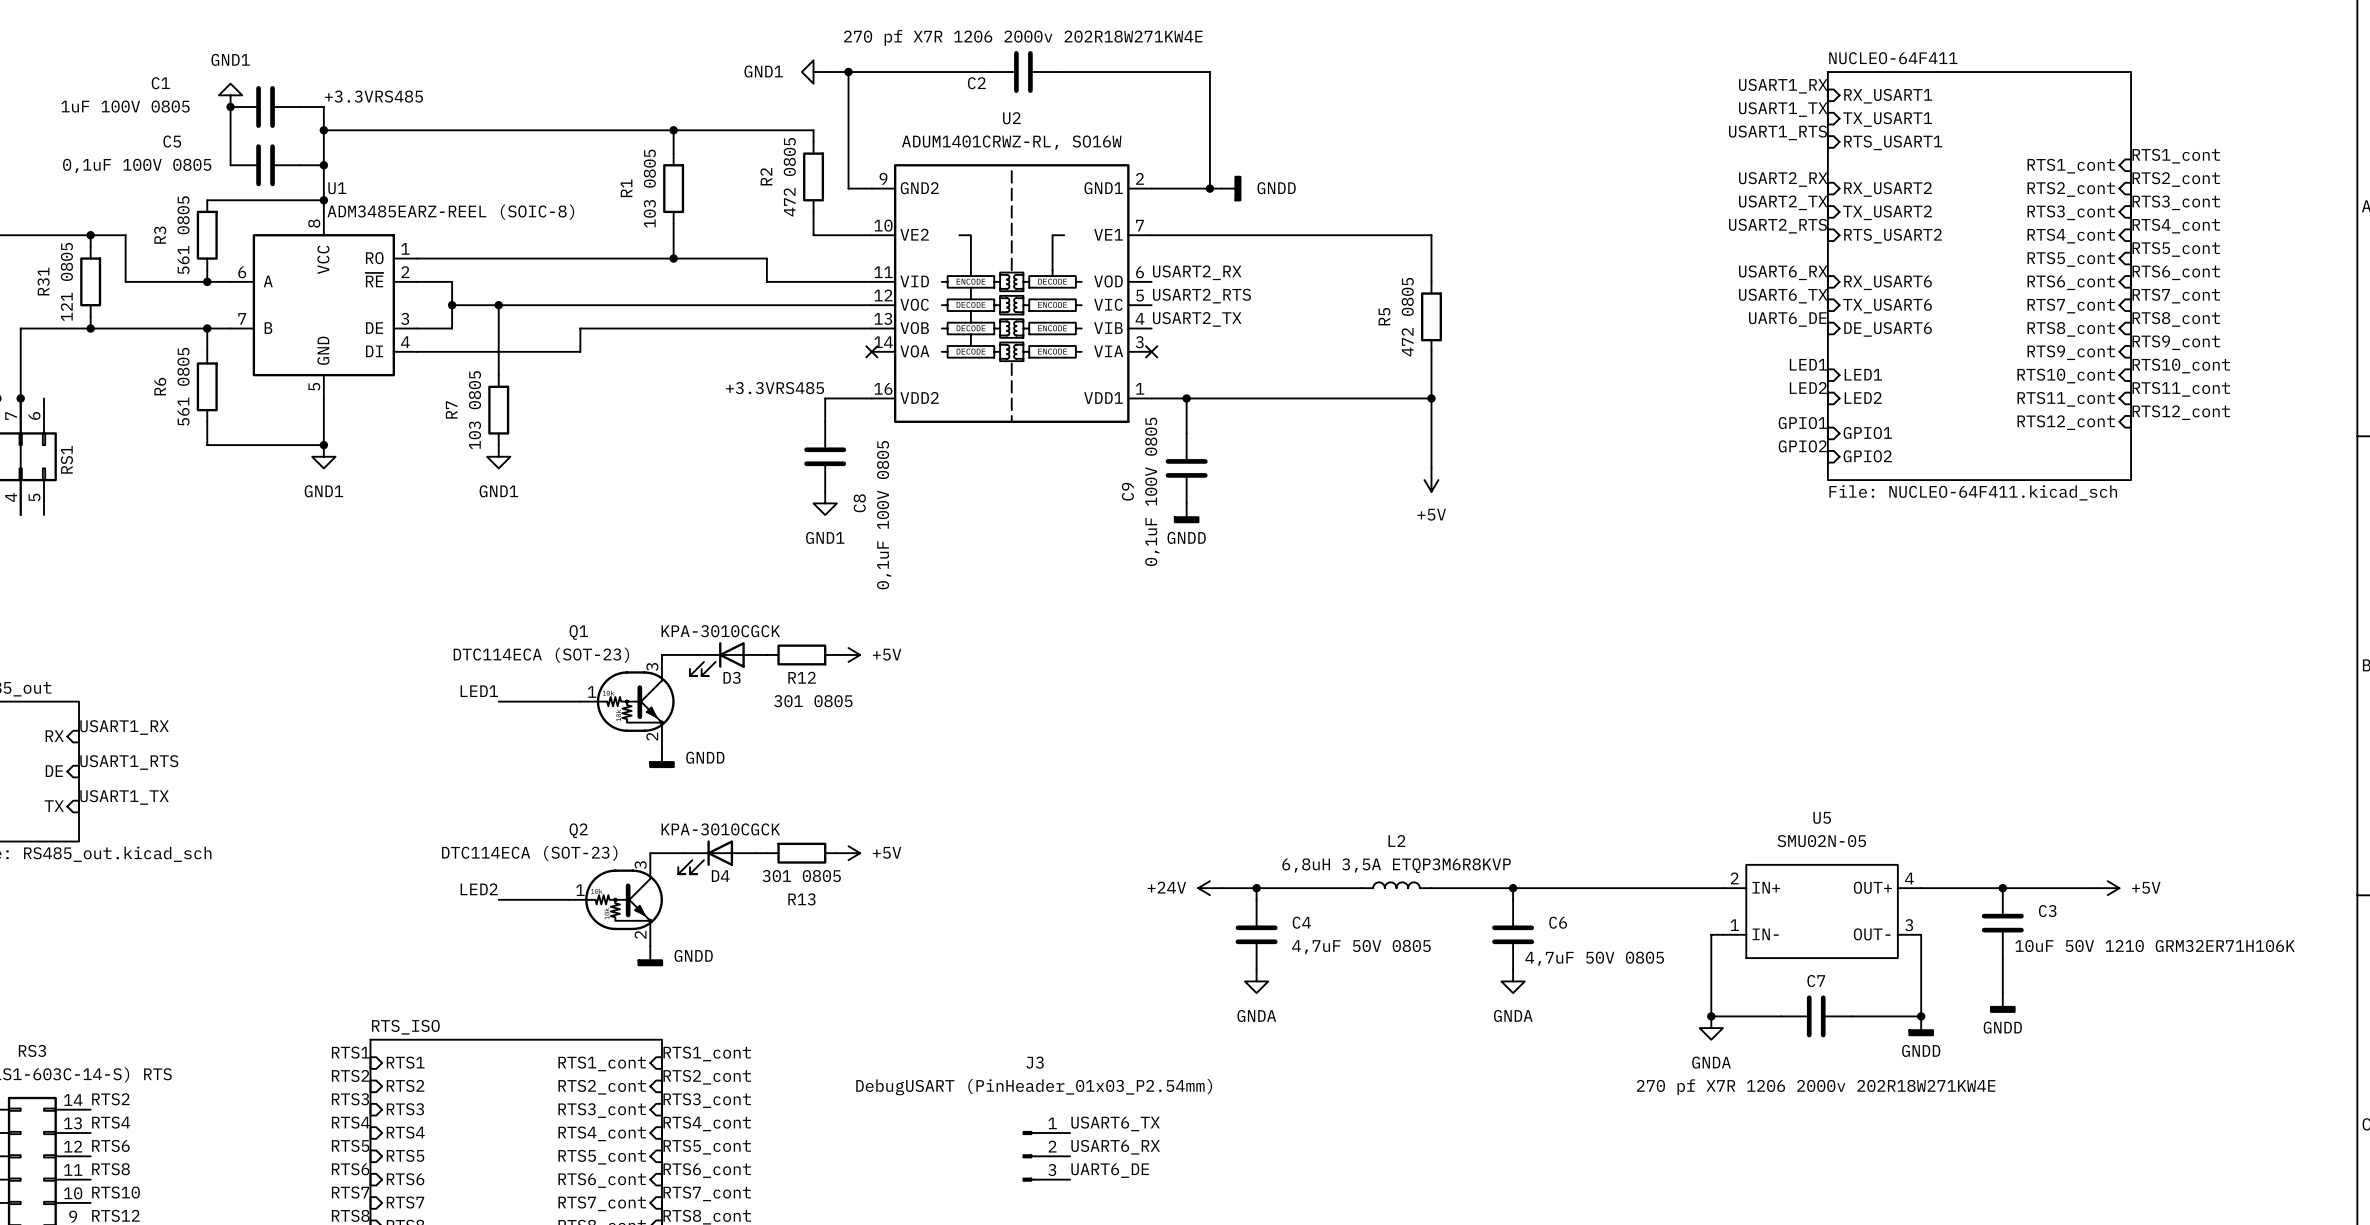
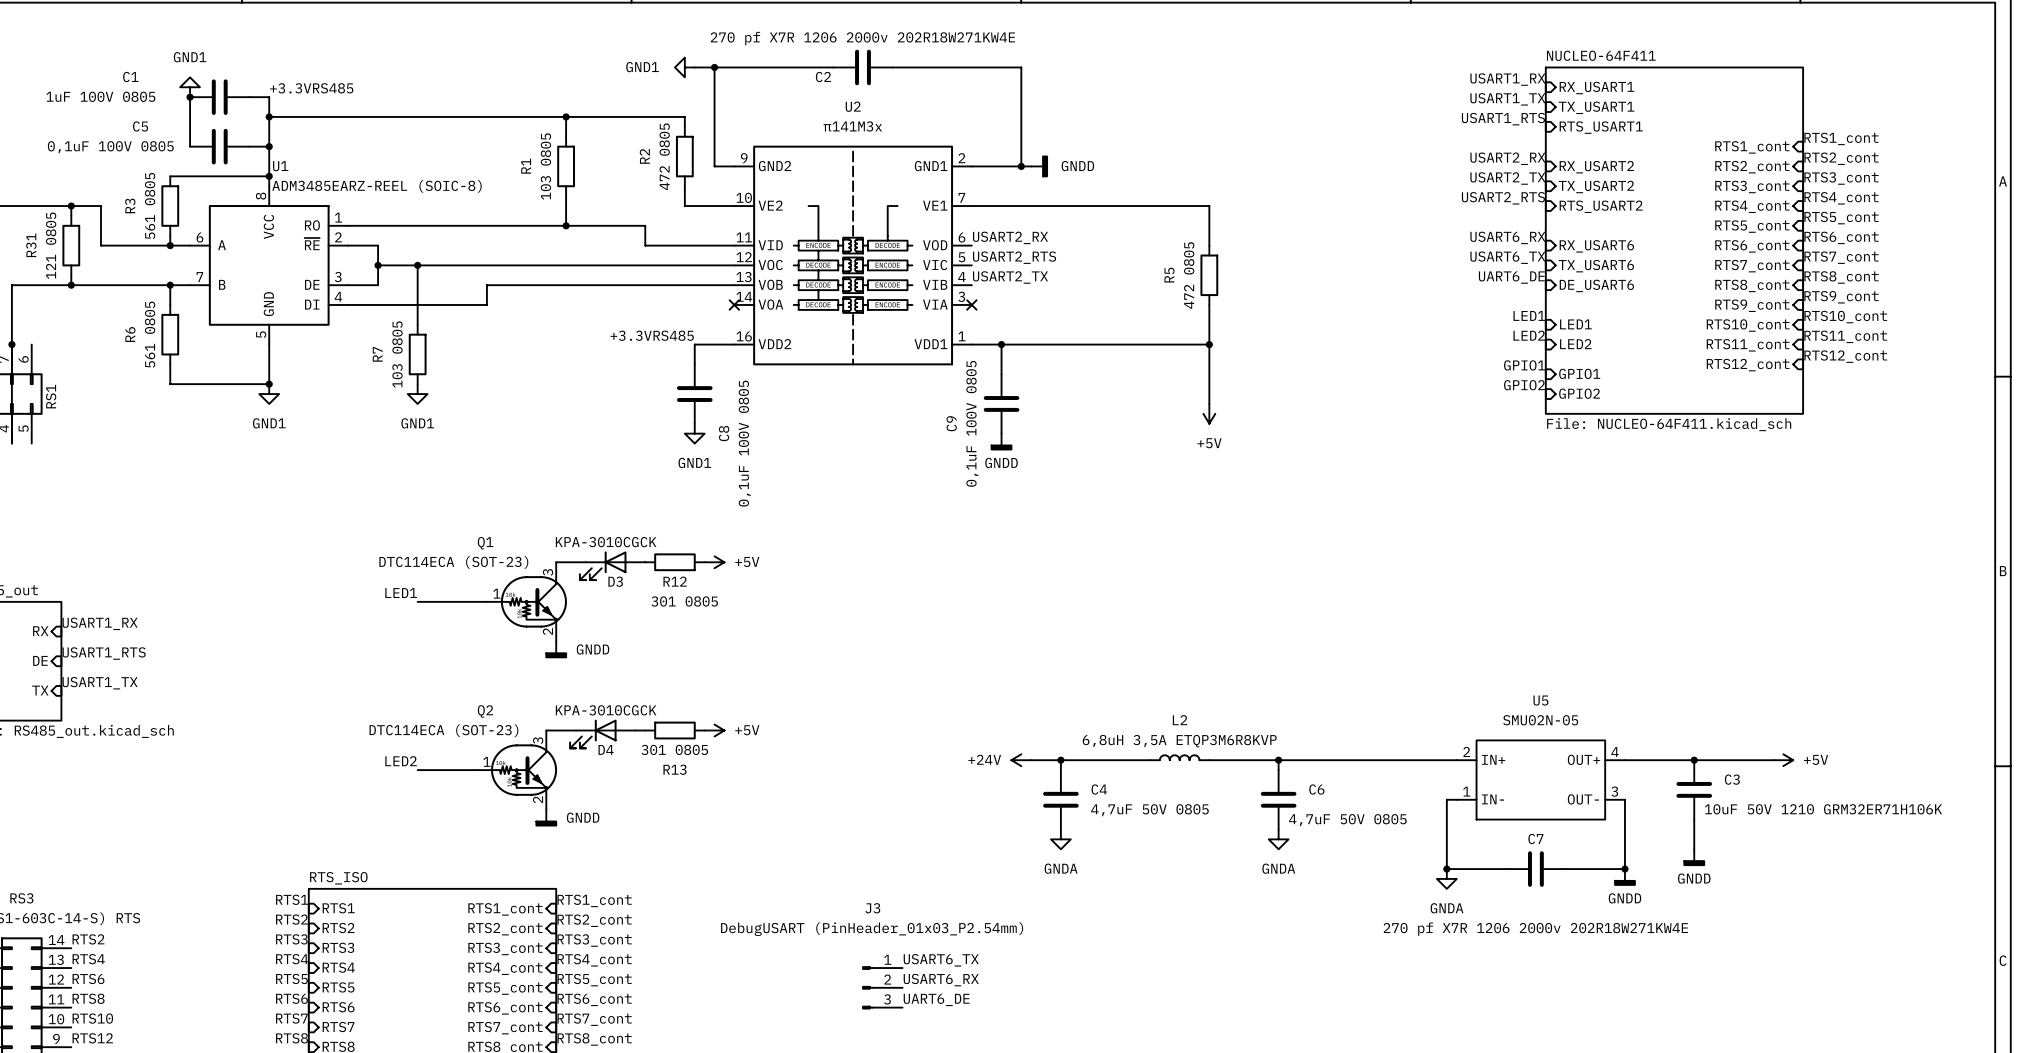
U2 value: ADUM1401CRWZ-RL, SO16W (1011, 142) -> π141M3x (852, 126)

